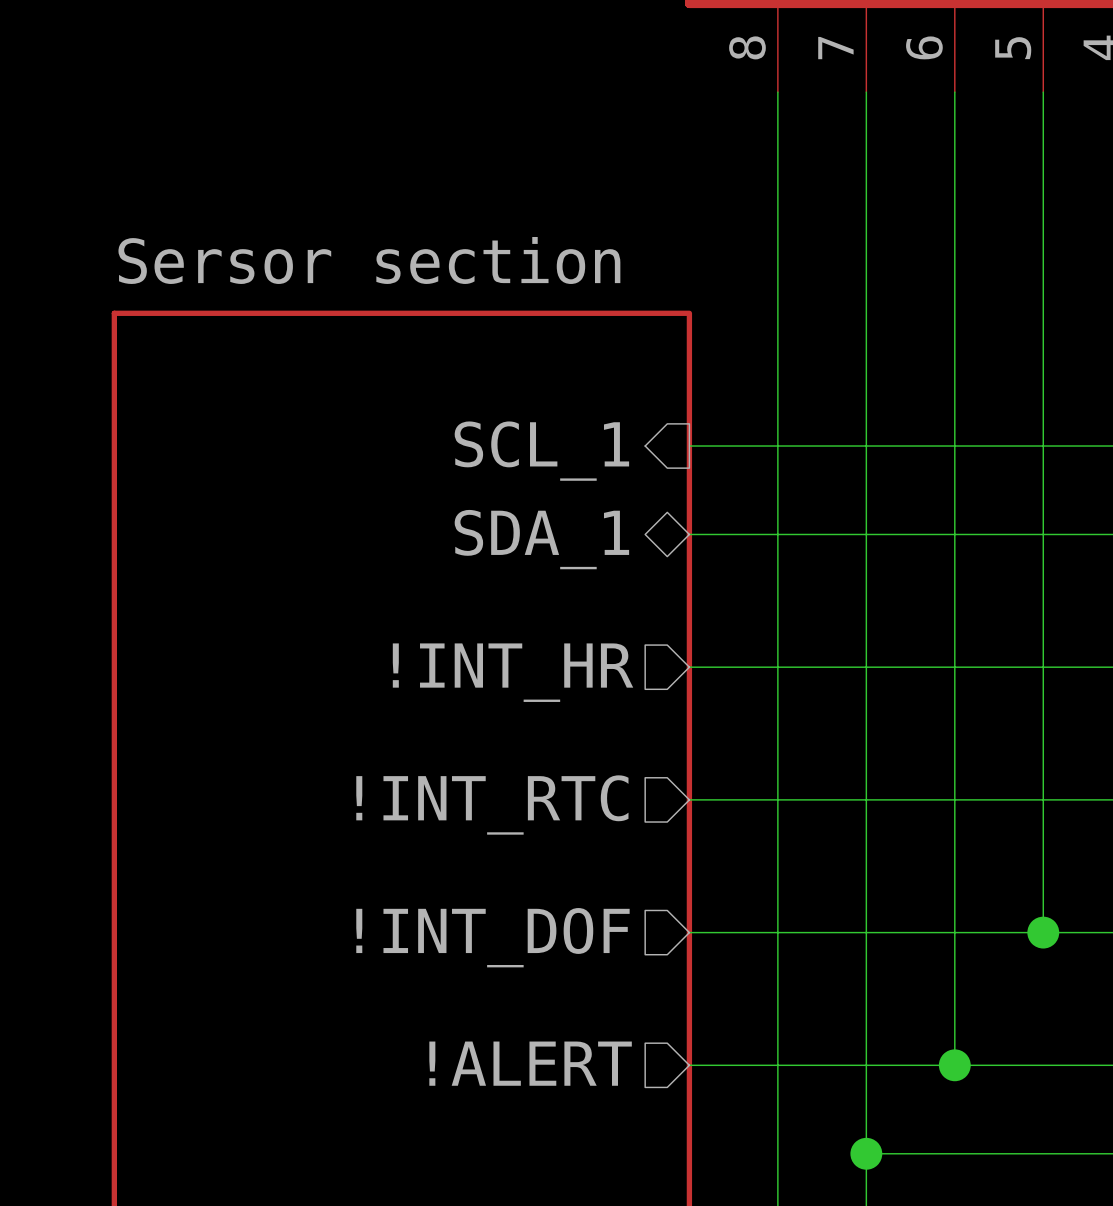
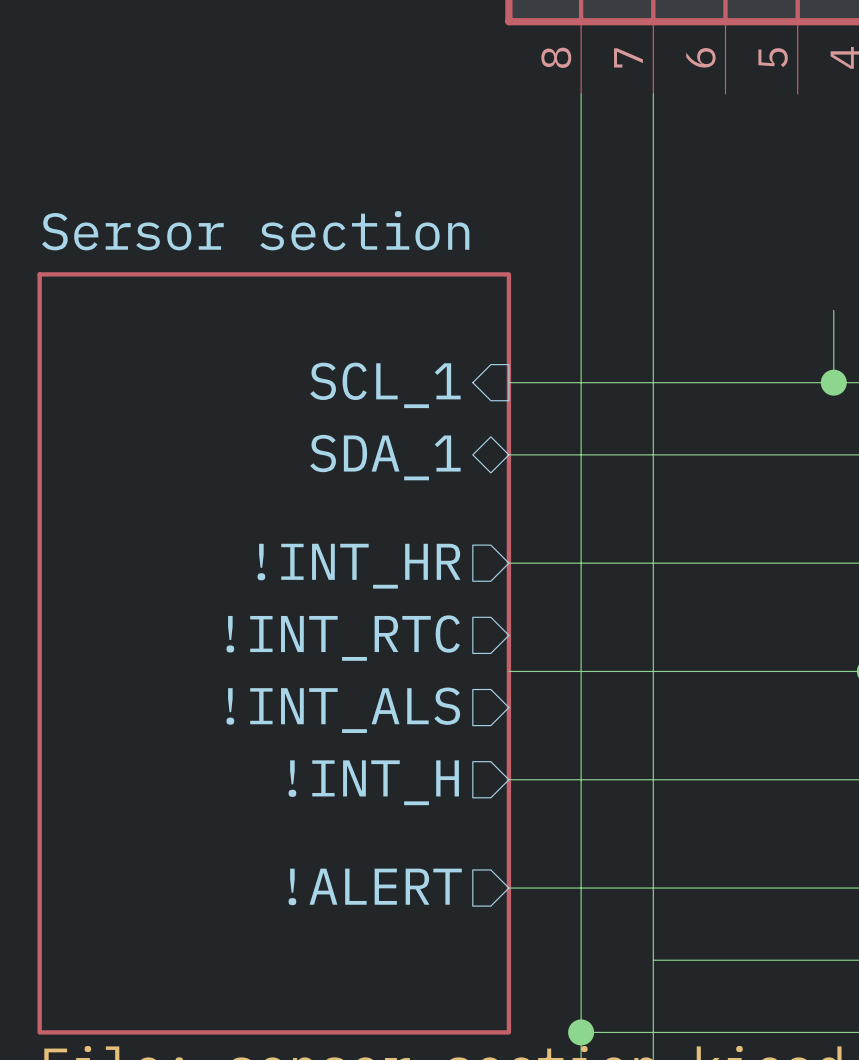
wire: (954, 92) (954, 1065) -> none
wire: (1043, 92) (1043, 932) -> none
wire: none -> (833, 310) (833, 382)
junction: none -> (833, 382)
sheet pin position: !INT_RTC (492, 804) -> !INT_RTC (343, 638)
sheet pin: none -> !INT_ALS (343, 710)
junction: (1043, 932) -> none
sheet pin: !INT_DOF (492, 937) -> !INT_H (373, 782)
junction: (954, 1065) -> none
junction: (866, 1153) -> none

